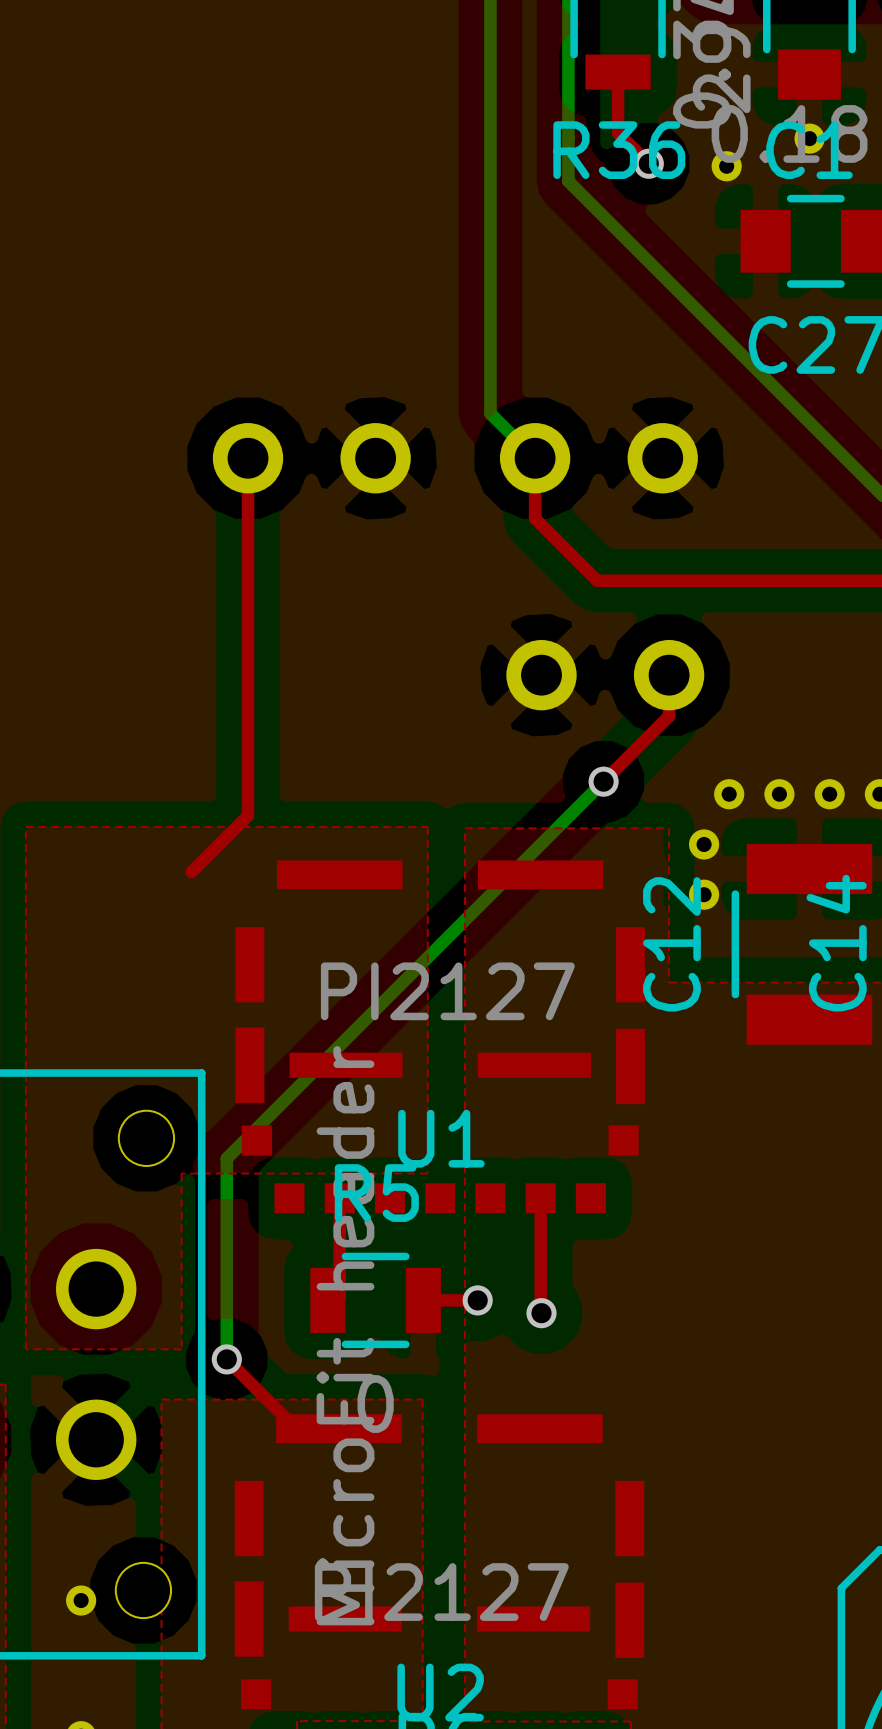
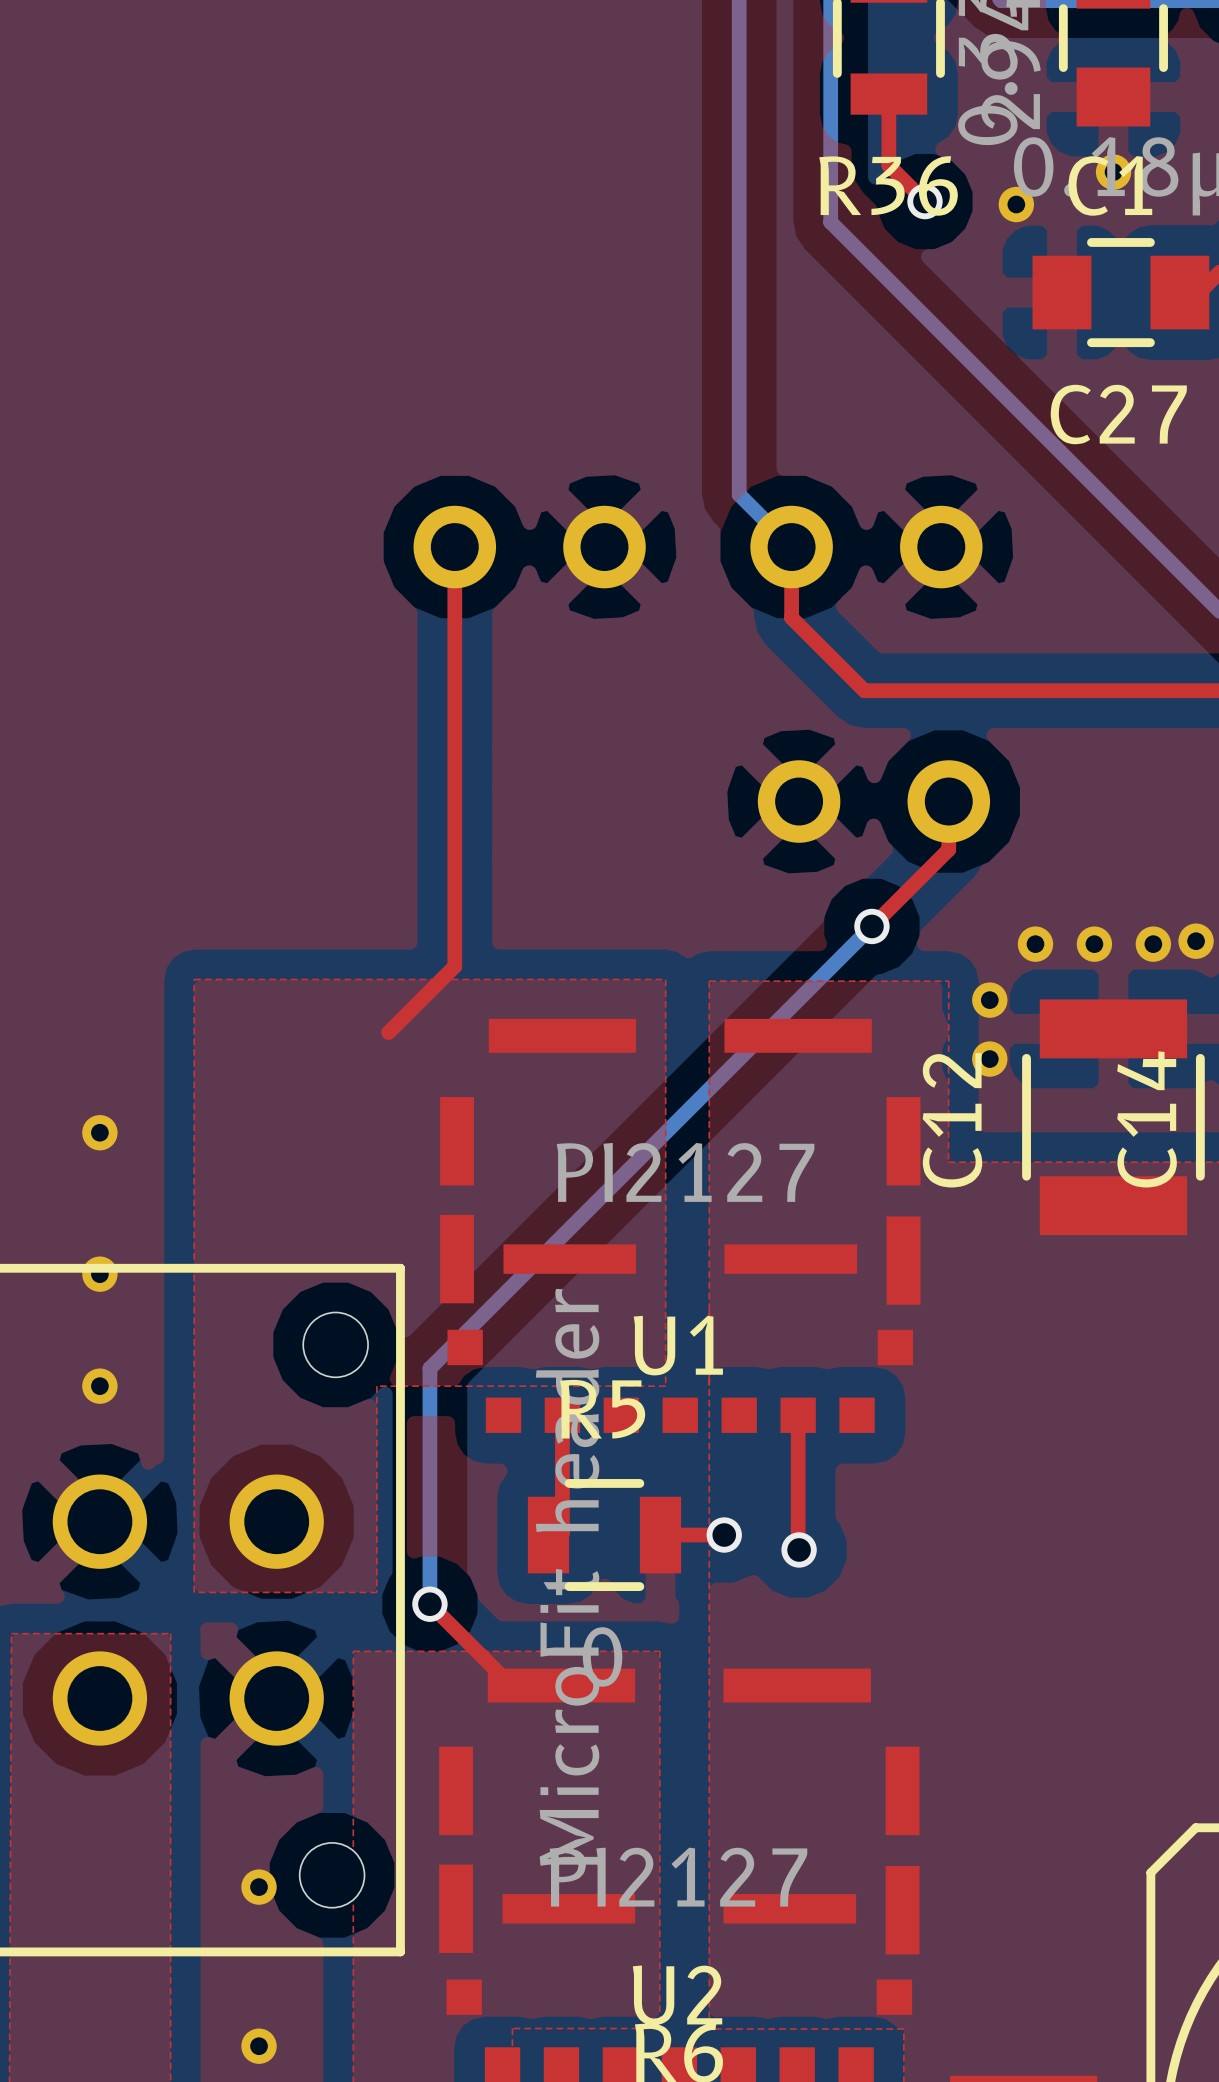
part position: (729, 794) -> (1035, 944)
part position: (779, 794) -> (1094, 944)
part position: (829, 794) -> (1153, 944)

